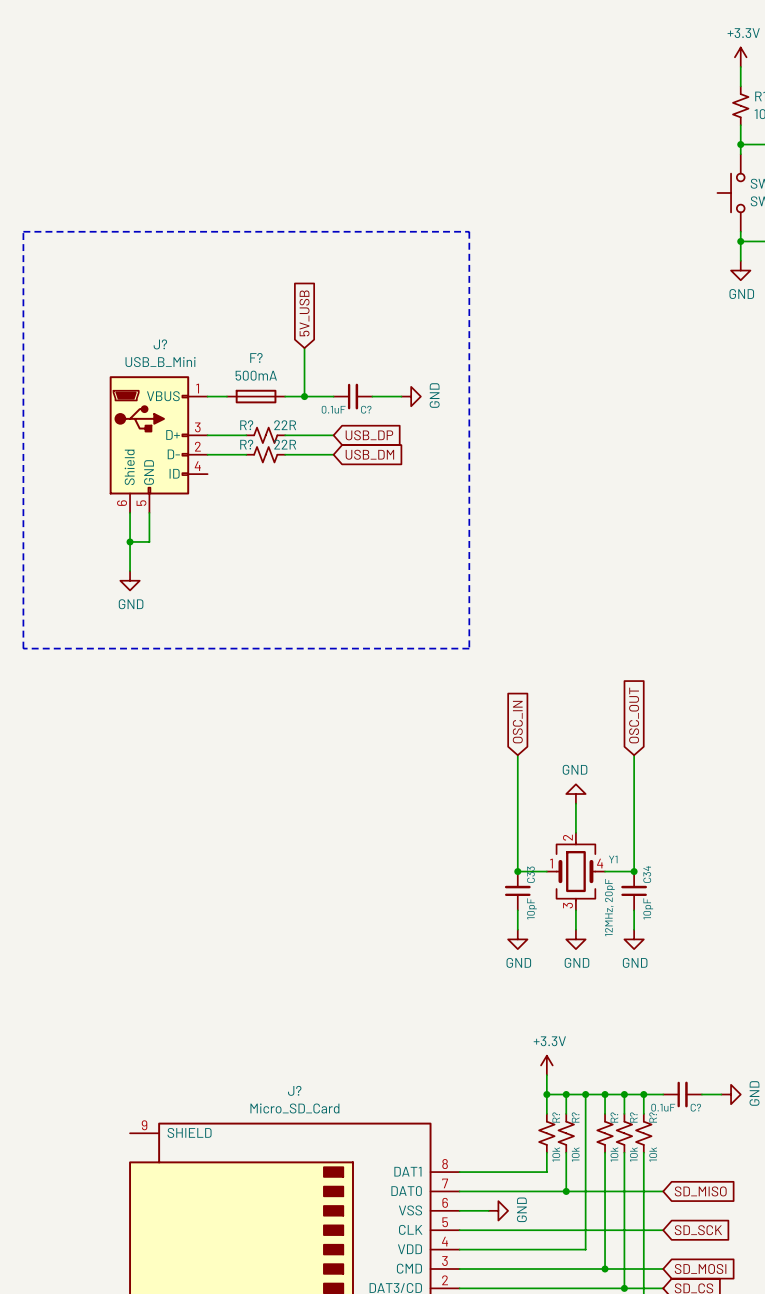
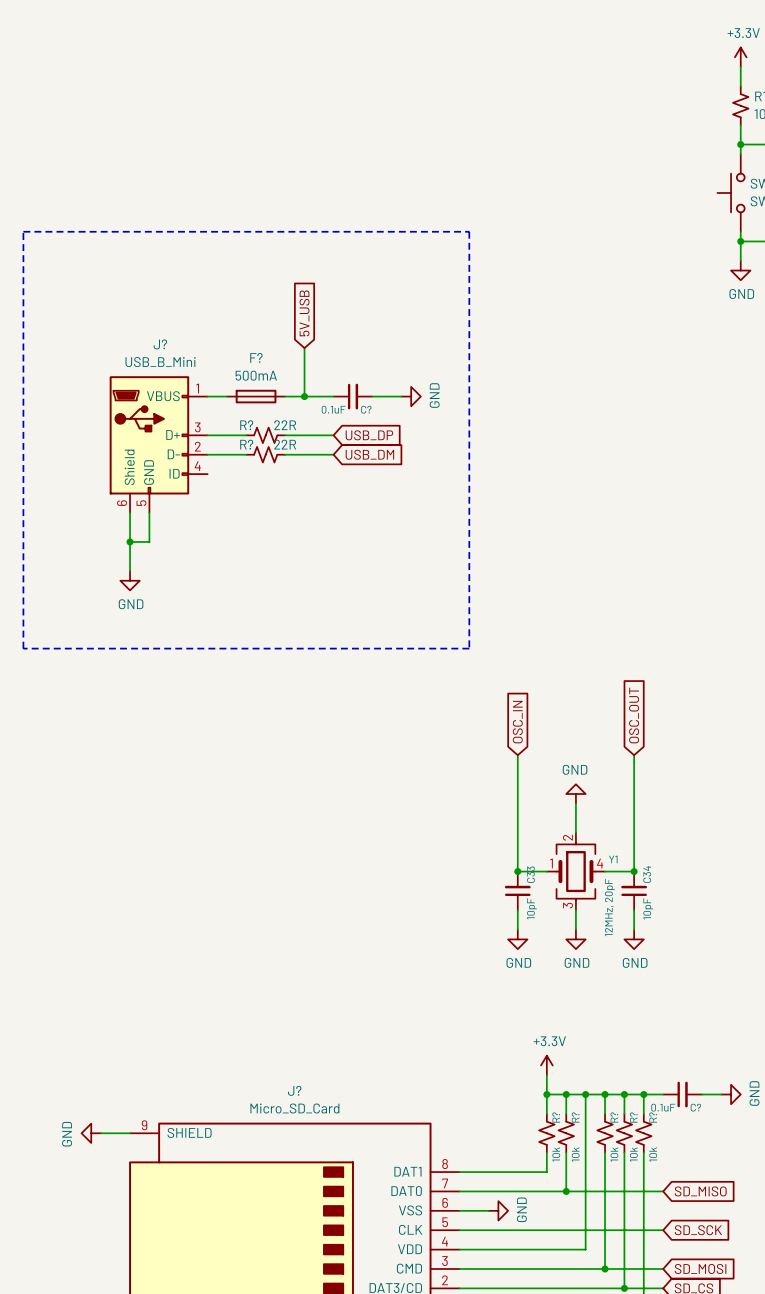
power symbol: none -> GND (91, 1133)
wire: none -> (100, 1133) (130, 1133)

